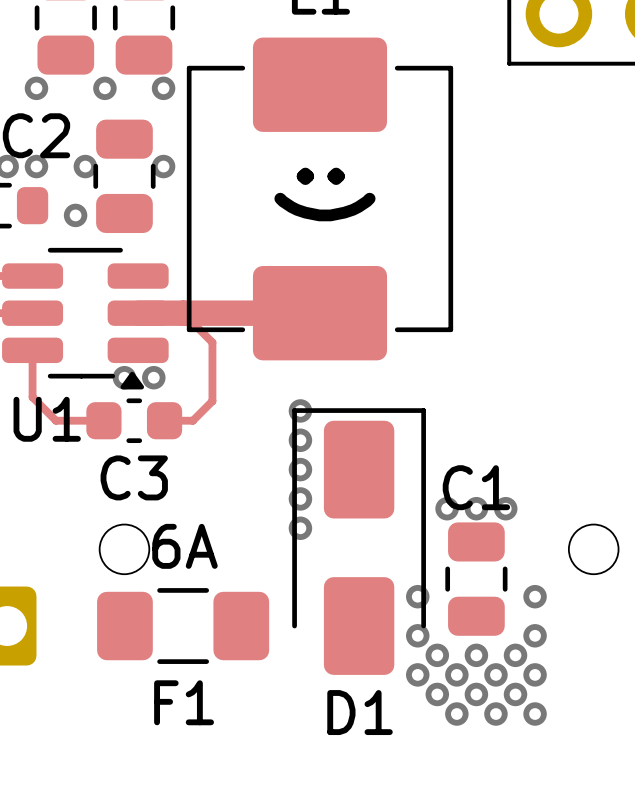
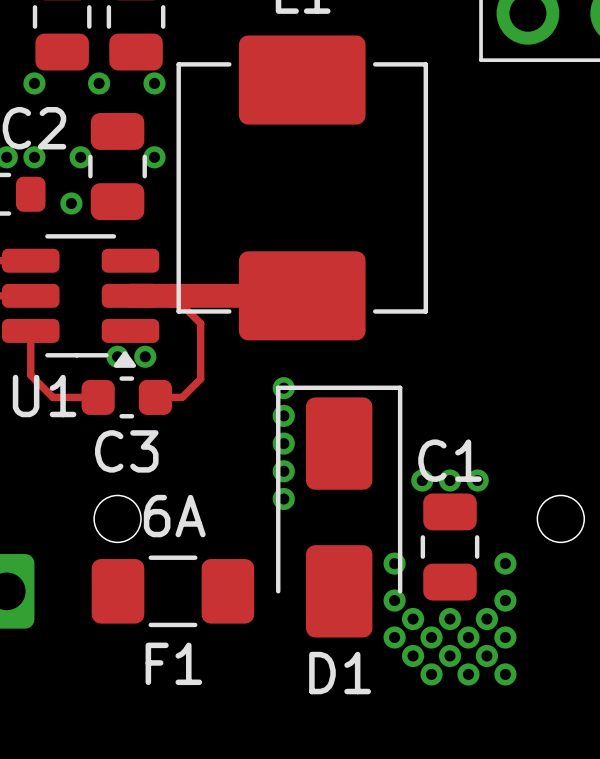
text: :) (324, 194) -> none

